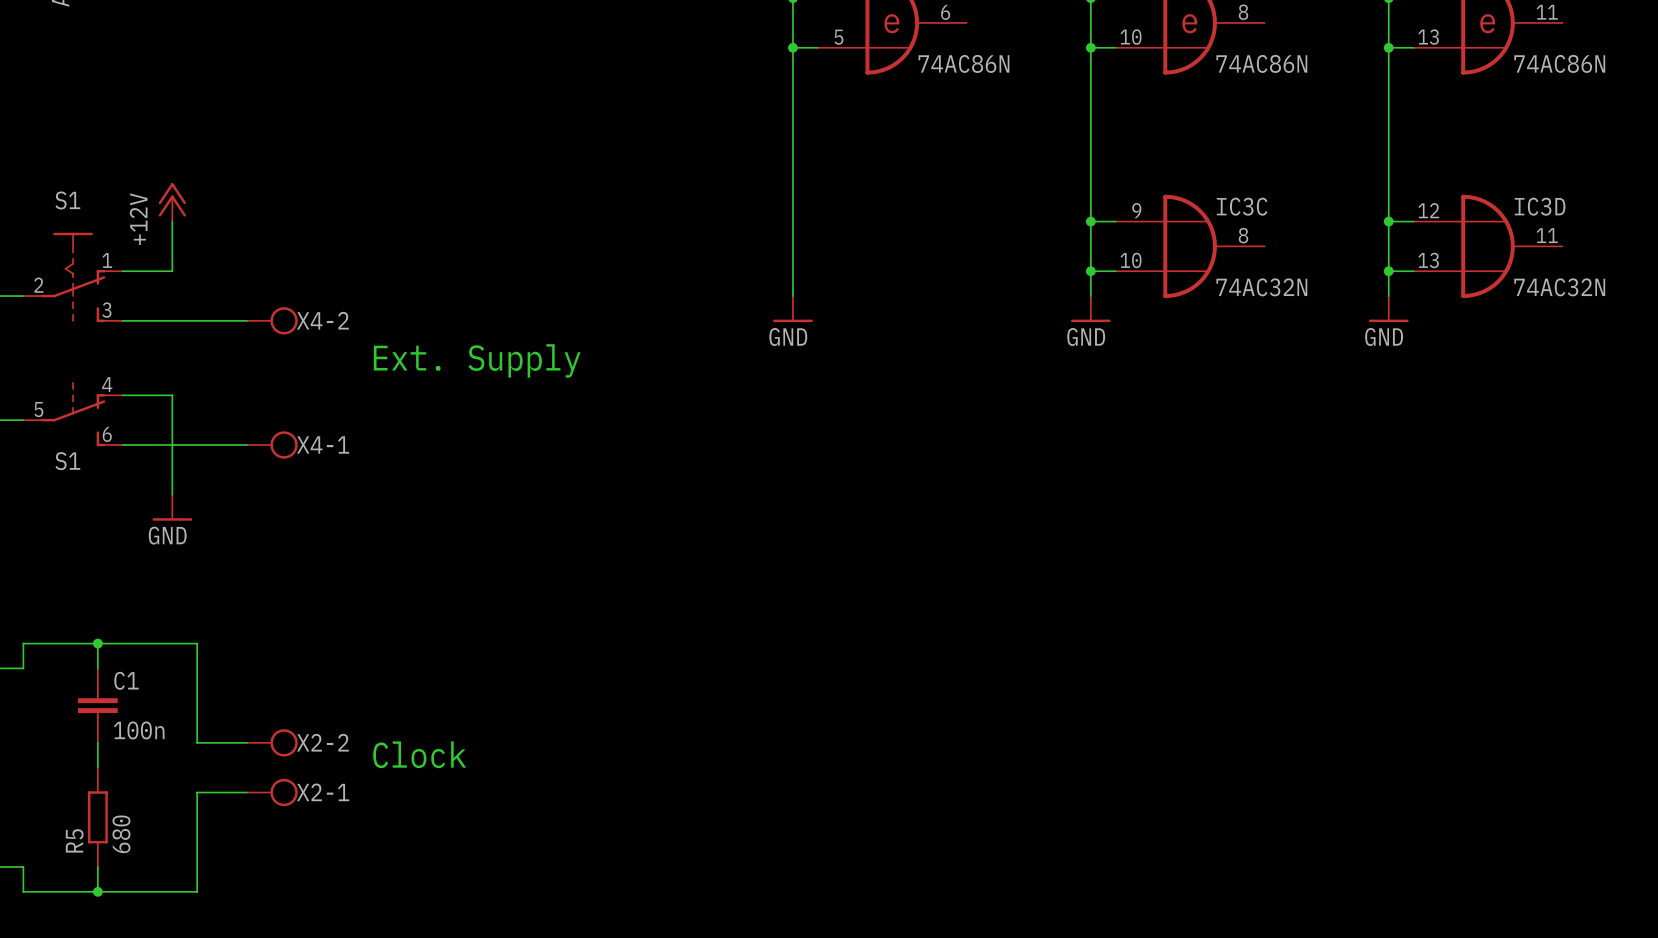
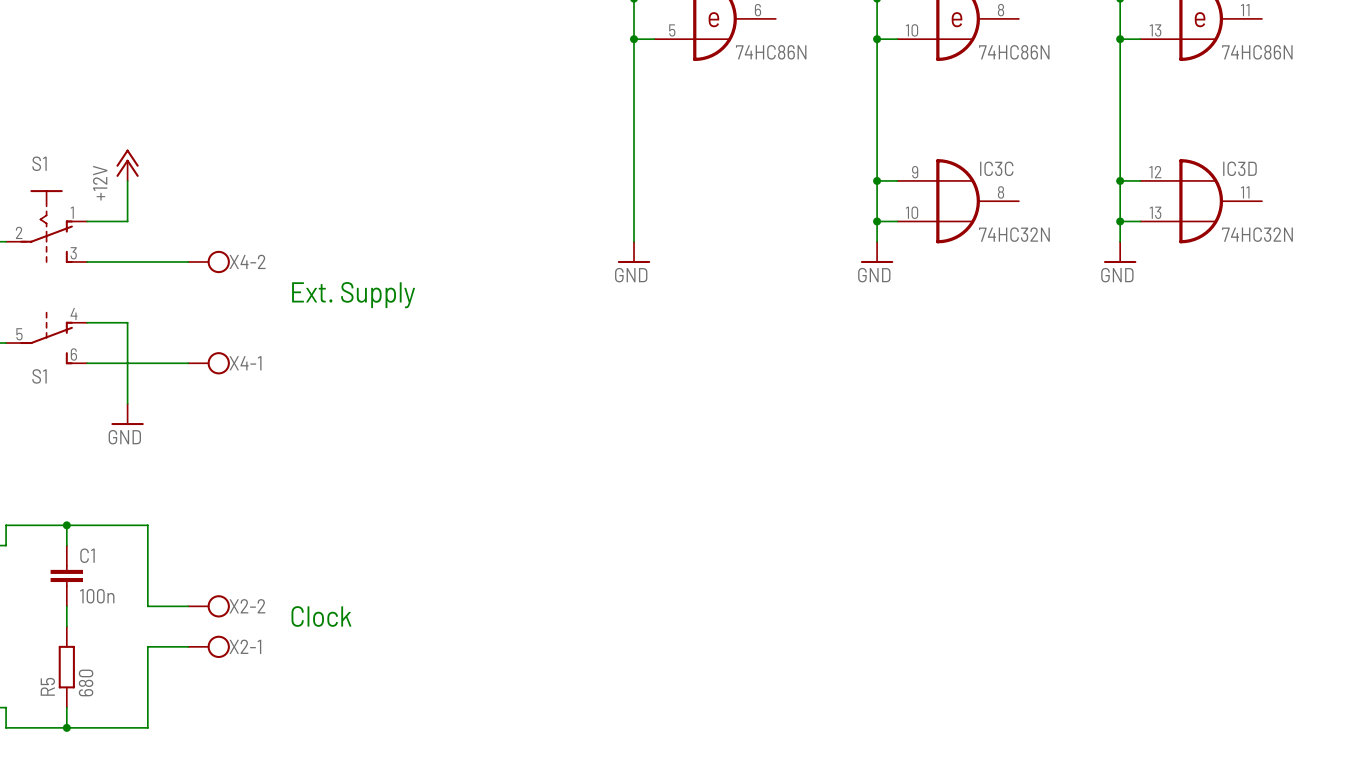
part value: 74AC86N (963, 63) -> 74HC86N (771, 52)
part value: 74AC86N (1261, 63) -> 74HC86N (1014, 52)
part value: 74AC86N (1559, 63) -> 74HC86N (1257, 52)
IC3C value: 74AC32N (1261, 287) -> 74HC32N (1014, 234)
IC3D value: 74AC32N (1559, 287) -> 74HC32N (1257, 234)

